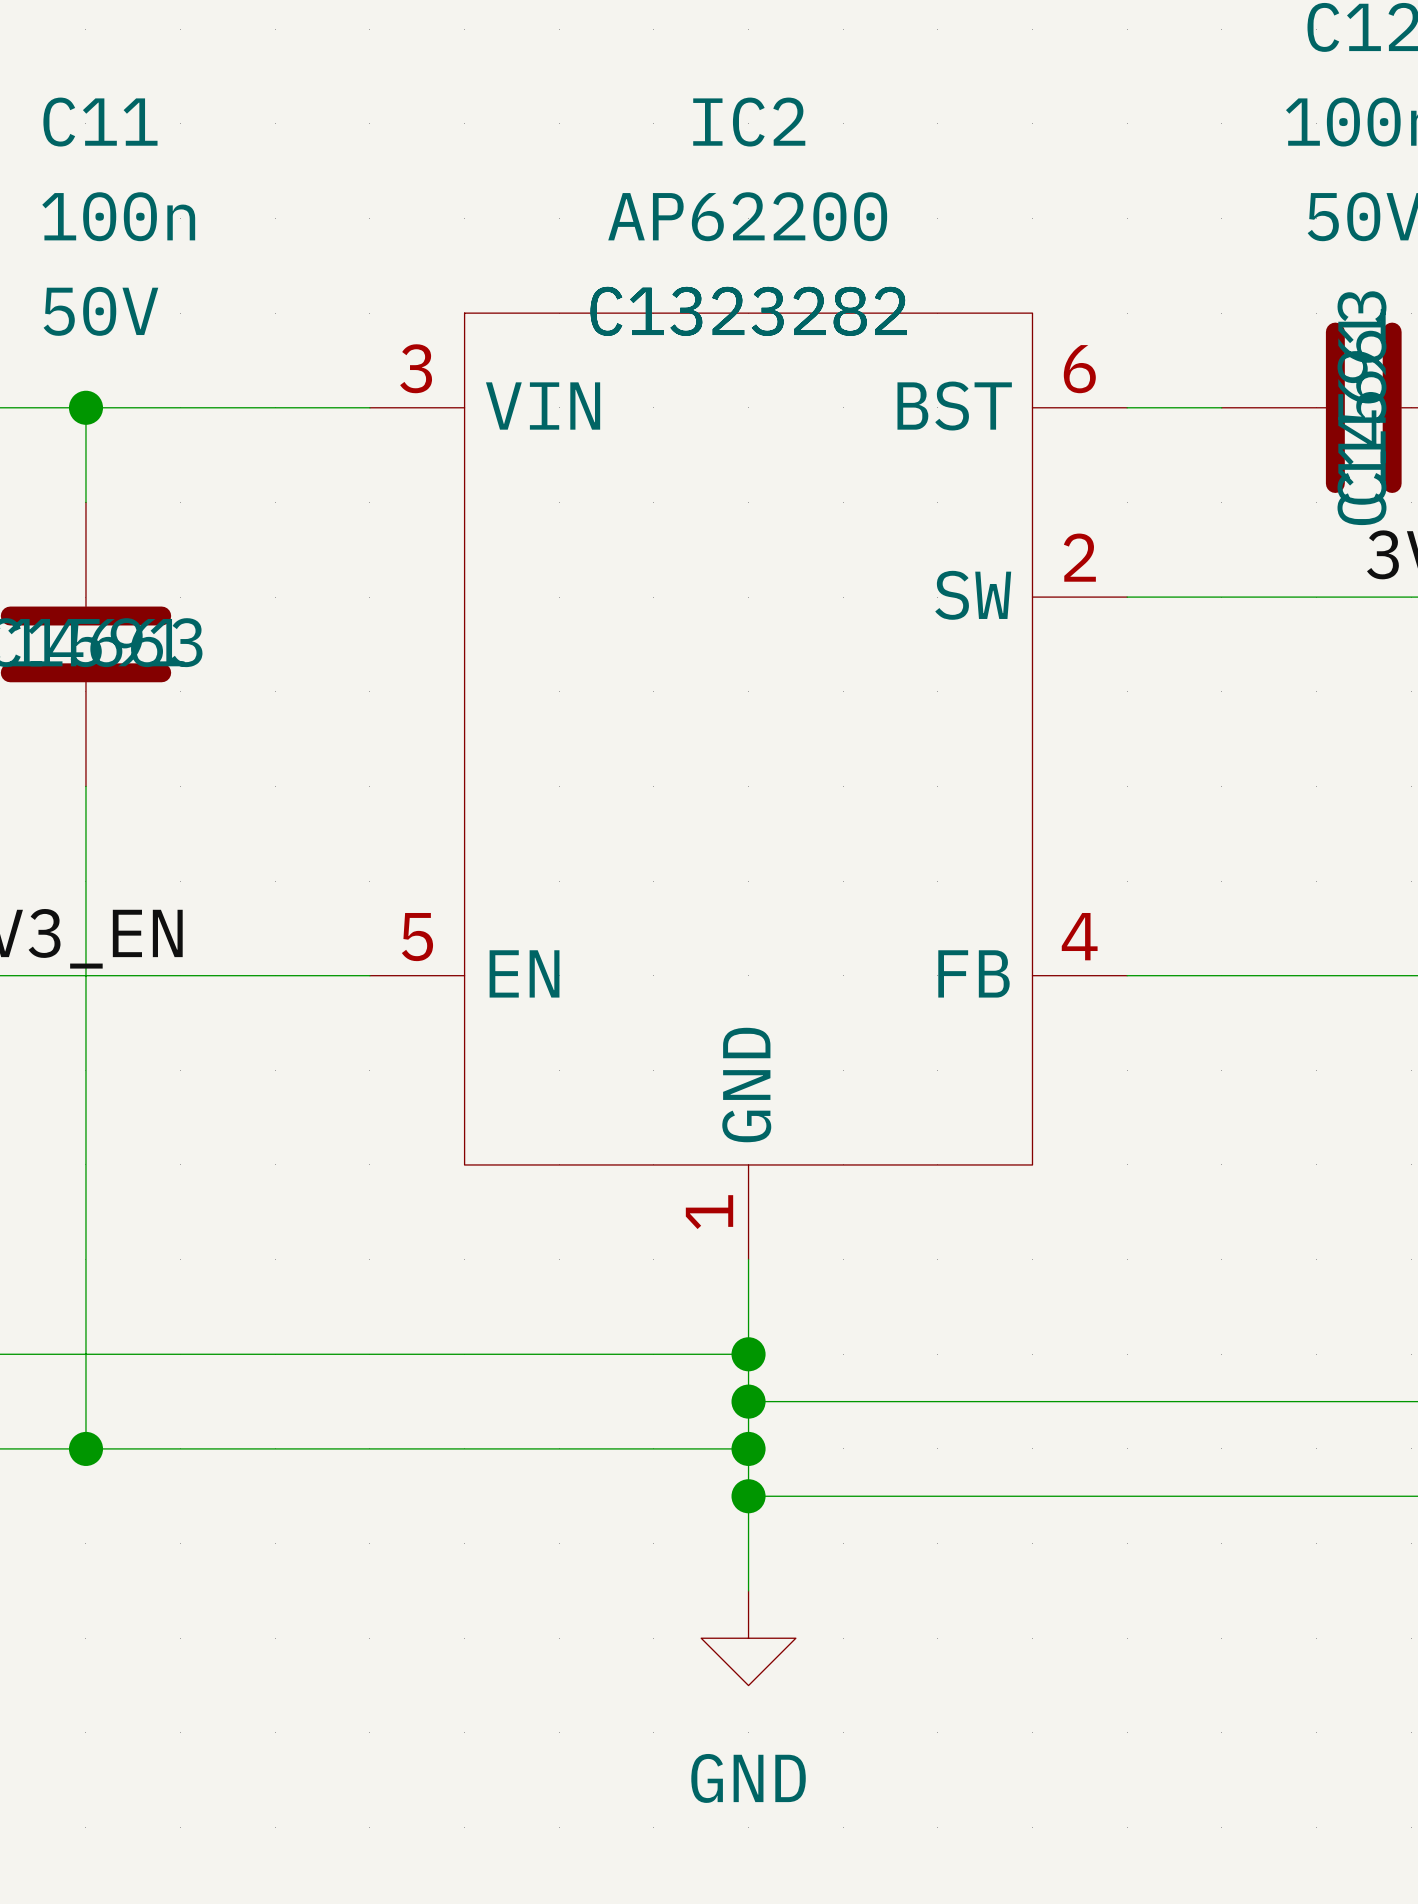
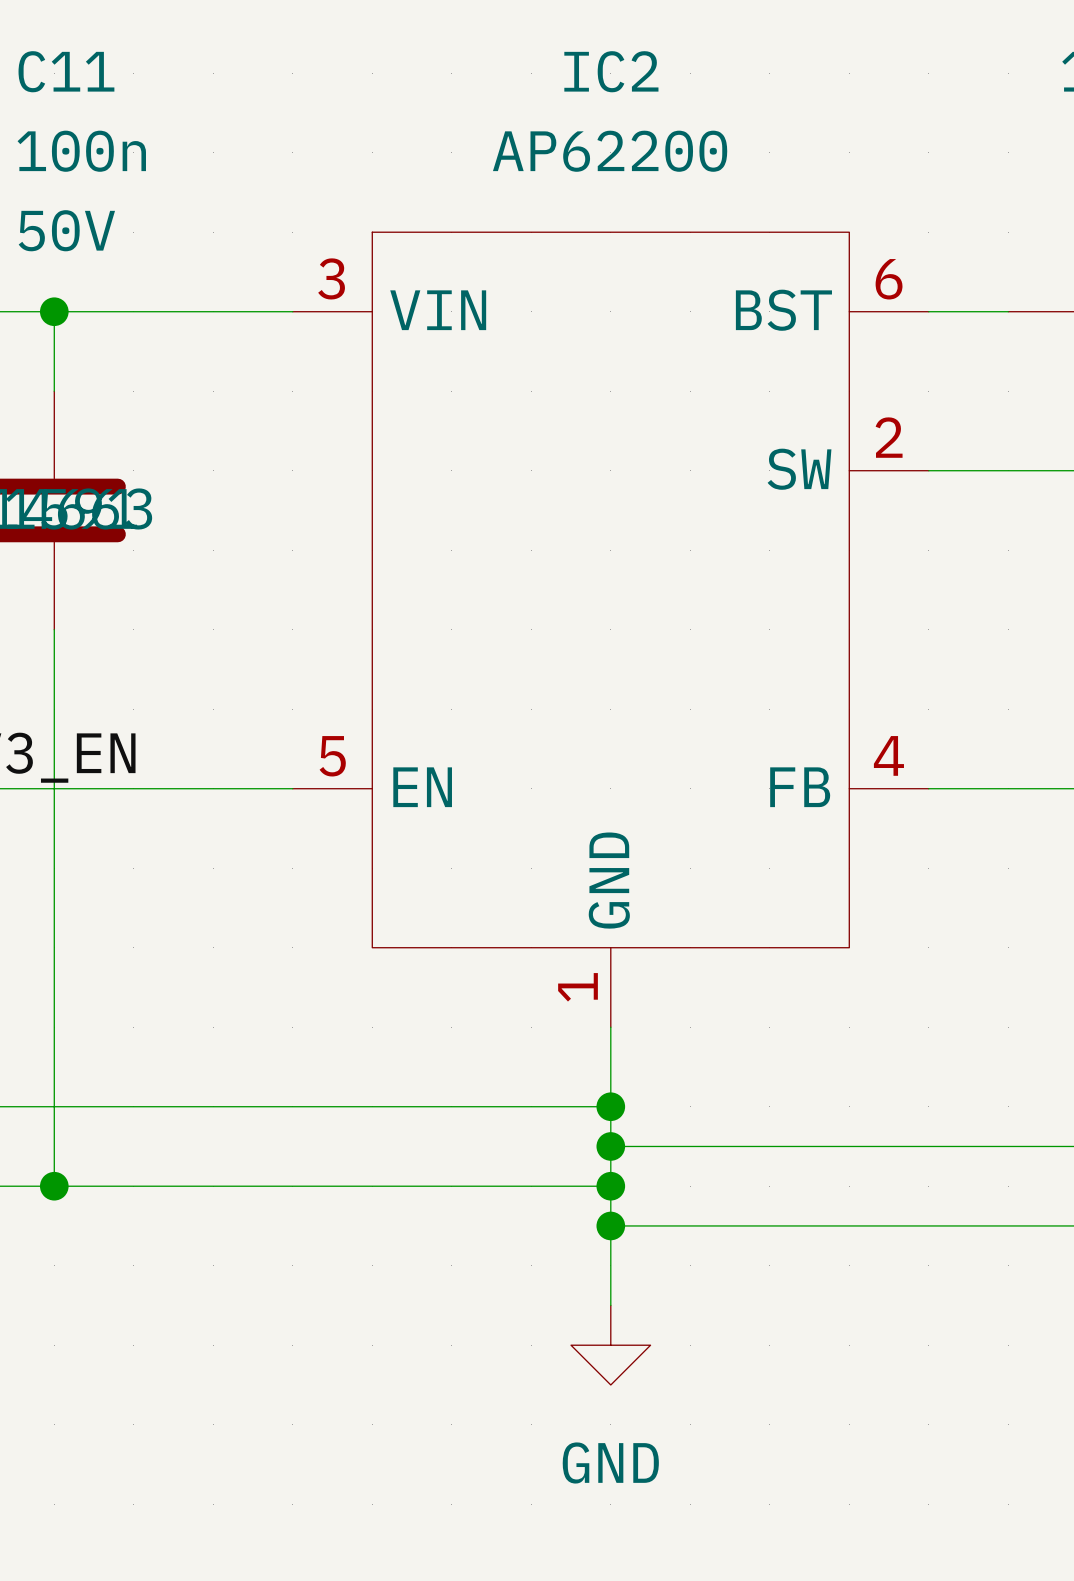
IC2 text: C1323282 (748, 311) -> none
IC2 text: C1323282 (748, 311) -> none

